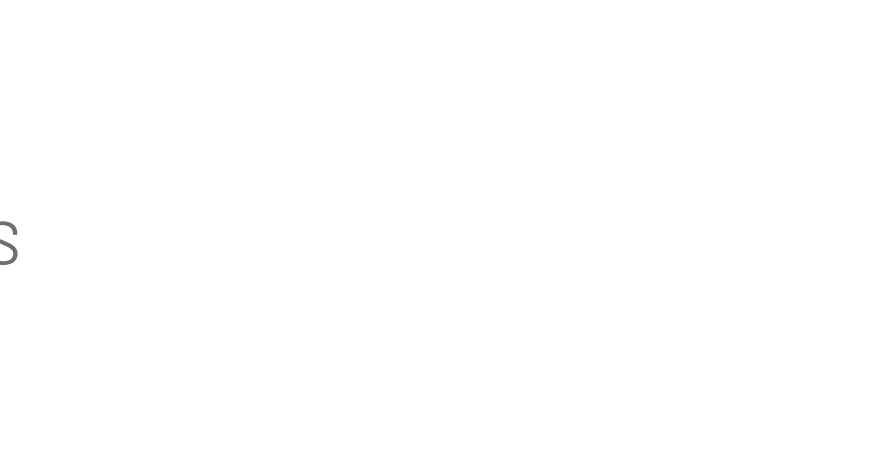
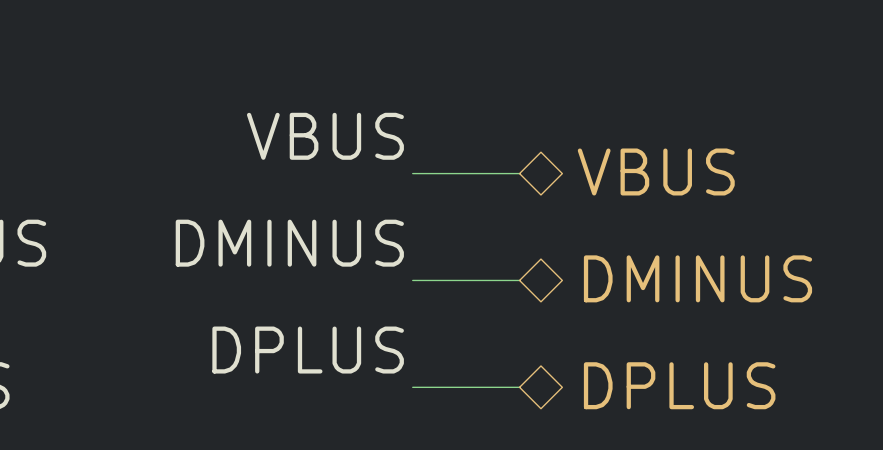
label: none -> VBUS (325, 136)
hierarchical label: none -> VBUS (656, 171)
wire: none -> (412, 173) (519, 173)
label: none -> DMINUS (289, 243)
hierarchical label: none -> DMINUS (697, 278)
wire: none -> (412, 280) (519, 280)
label: none -> DPLUS (308, 350)
hierarchical label: none -> DPLUS (679, 385)
wire: none -> (412, 387) (519, 387)

